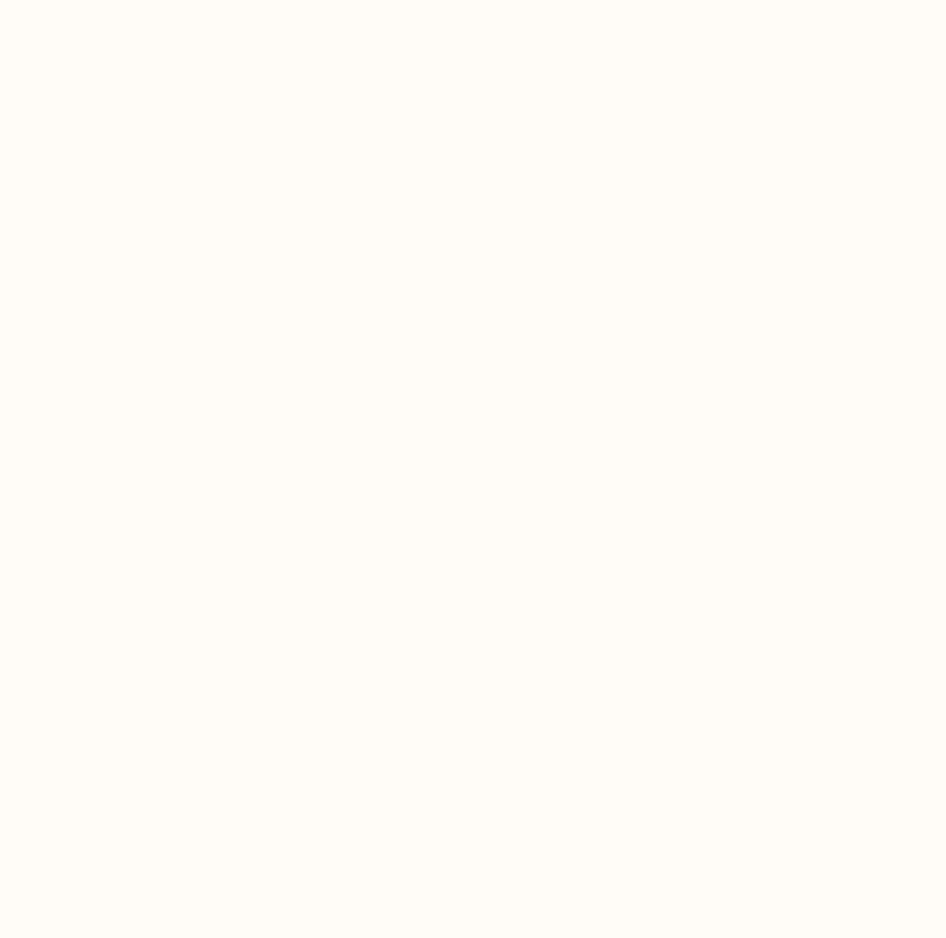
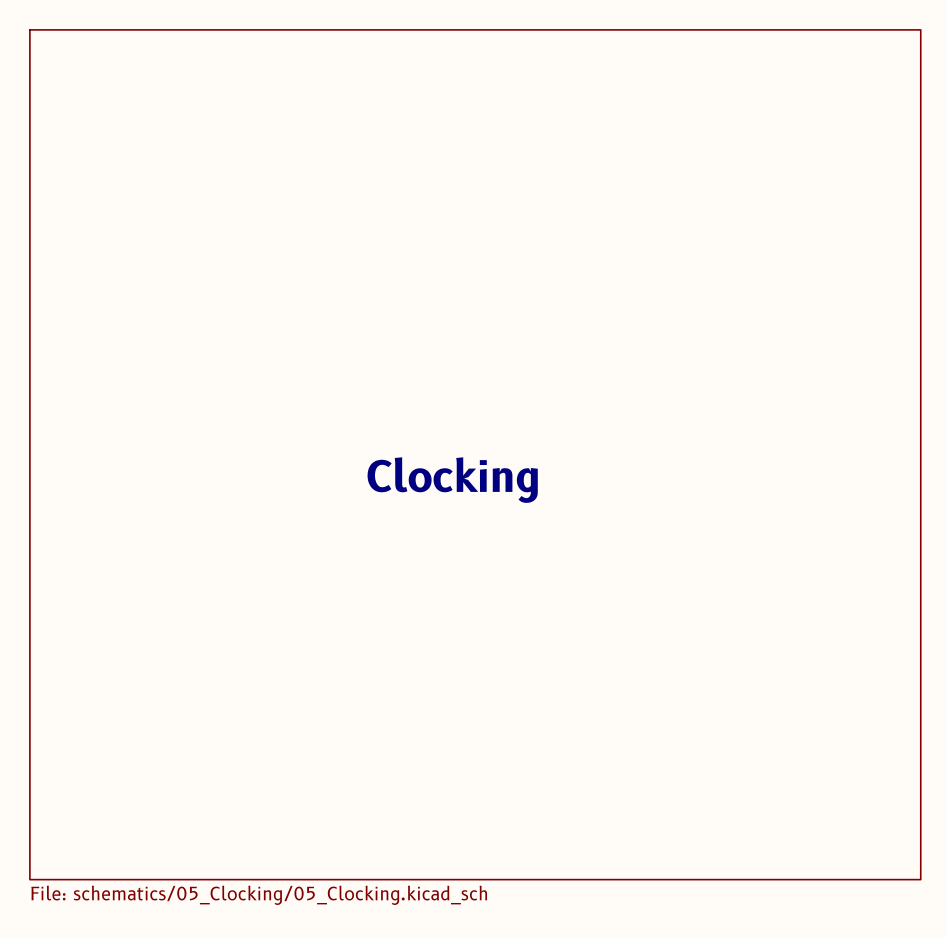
sheet Clocking: none -> File: schematics/05_Clocking/05_Clocking.kicad_sch (475, 454)

